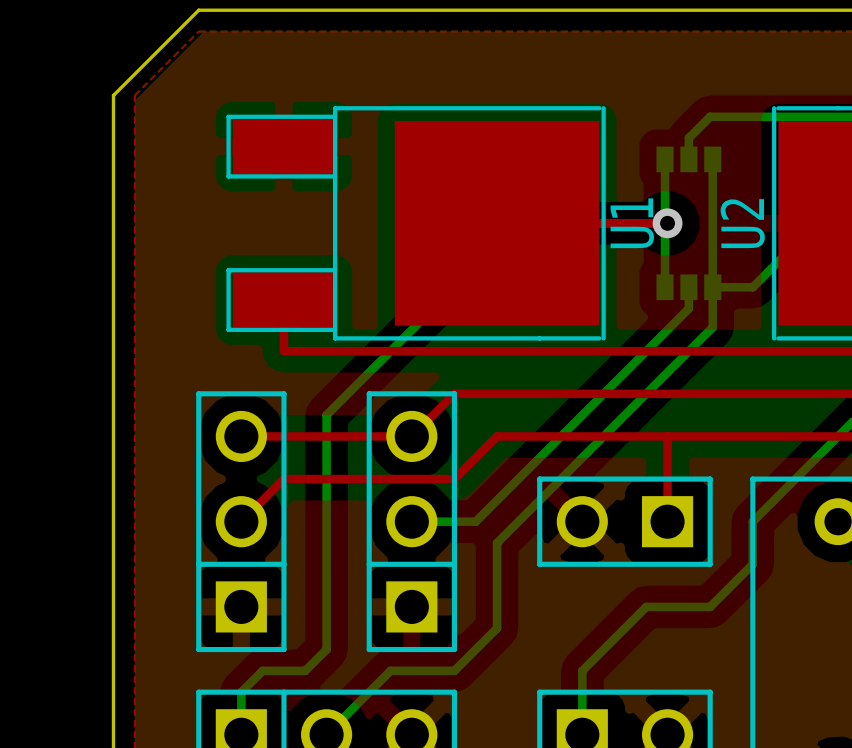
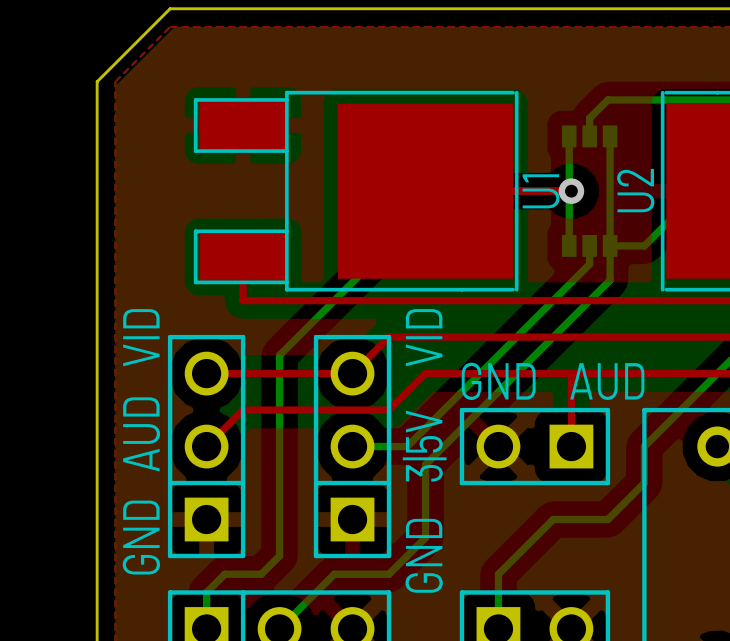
text: none -> VID (141, 337)
text: none -> VID (424, 337)
text: none -> GND (498, 381)
text: none -> AUD (607, 381)
text: none -> AUD (141, 434)
text: none -> 3|5V (424, 446)
text: none -> GND (141, 537)
text: none -> GND (424, 555)

